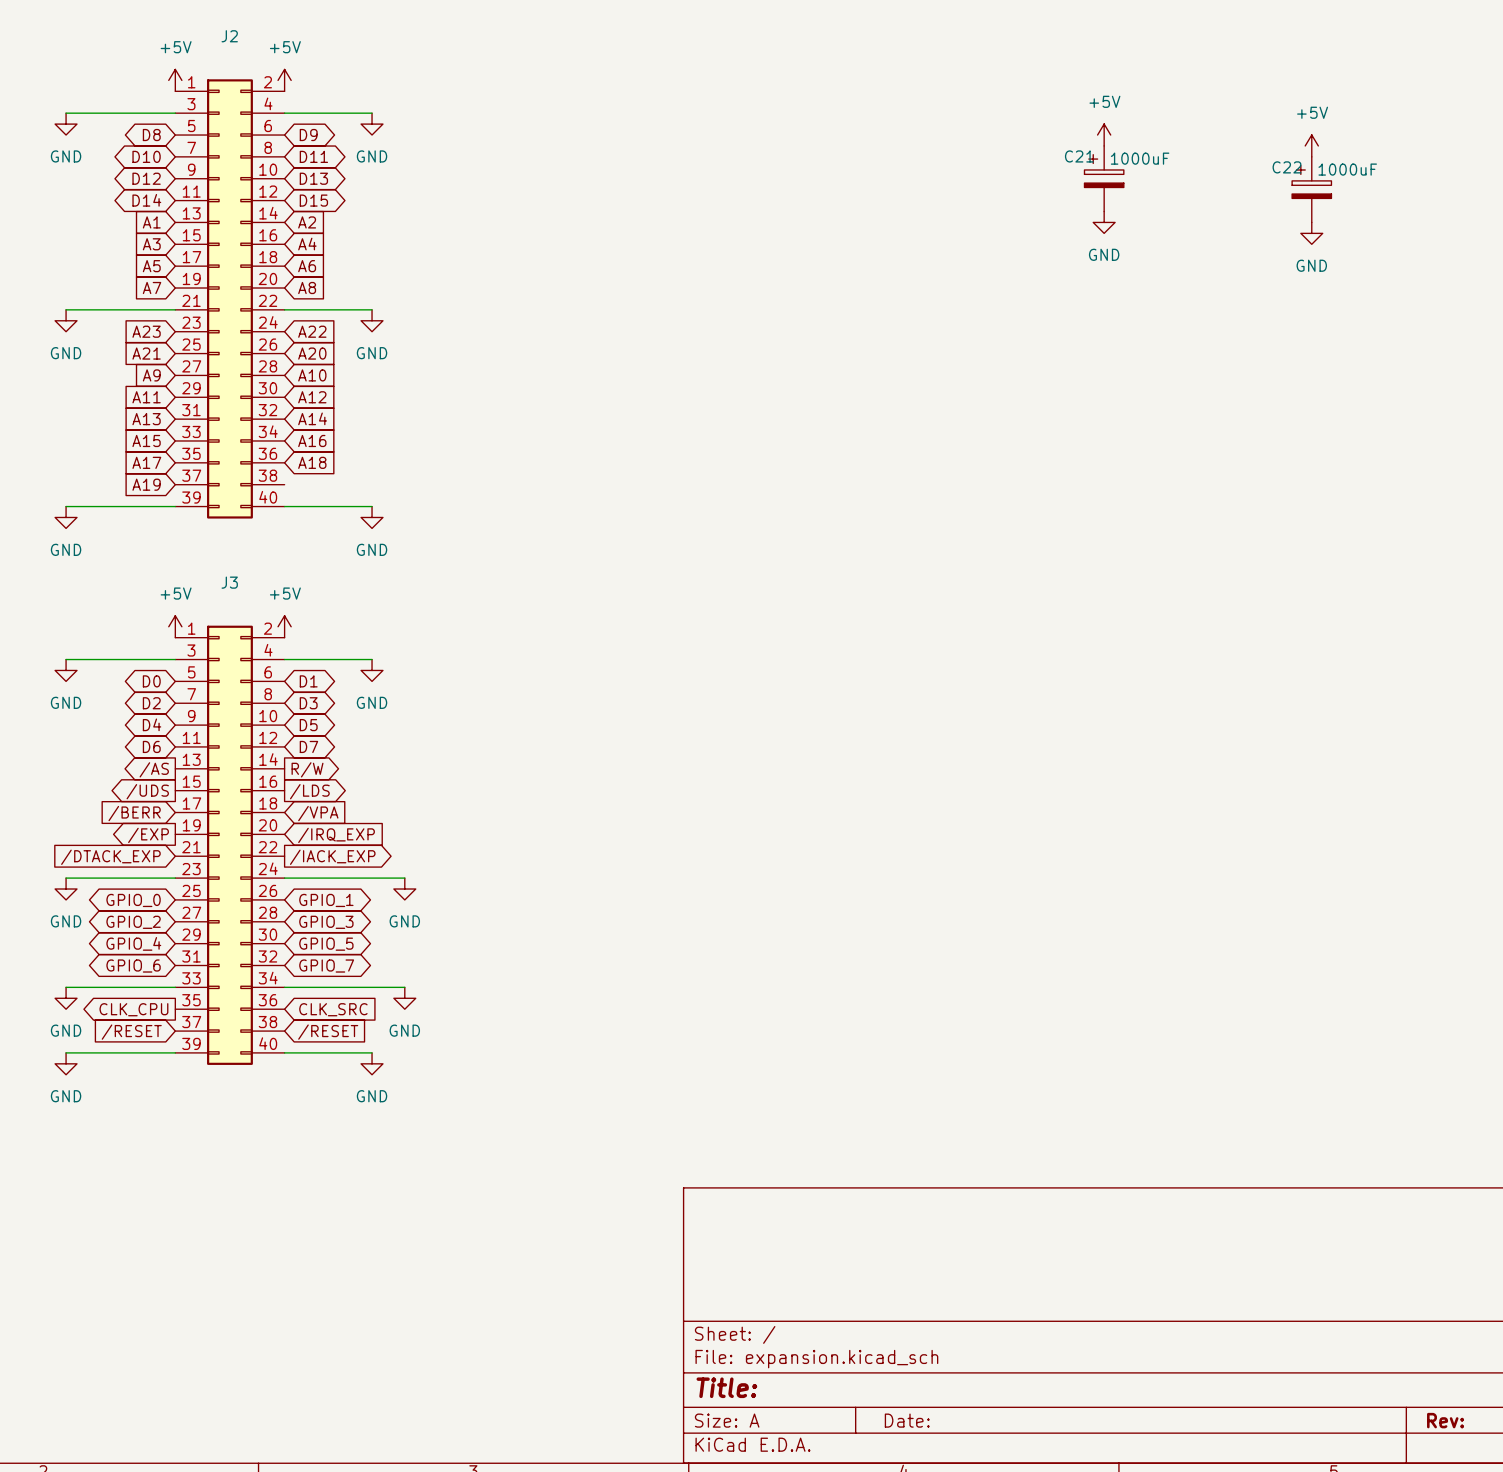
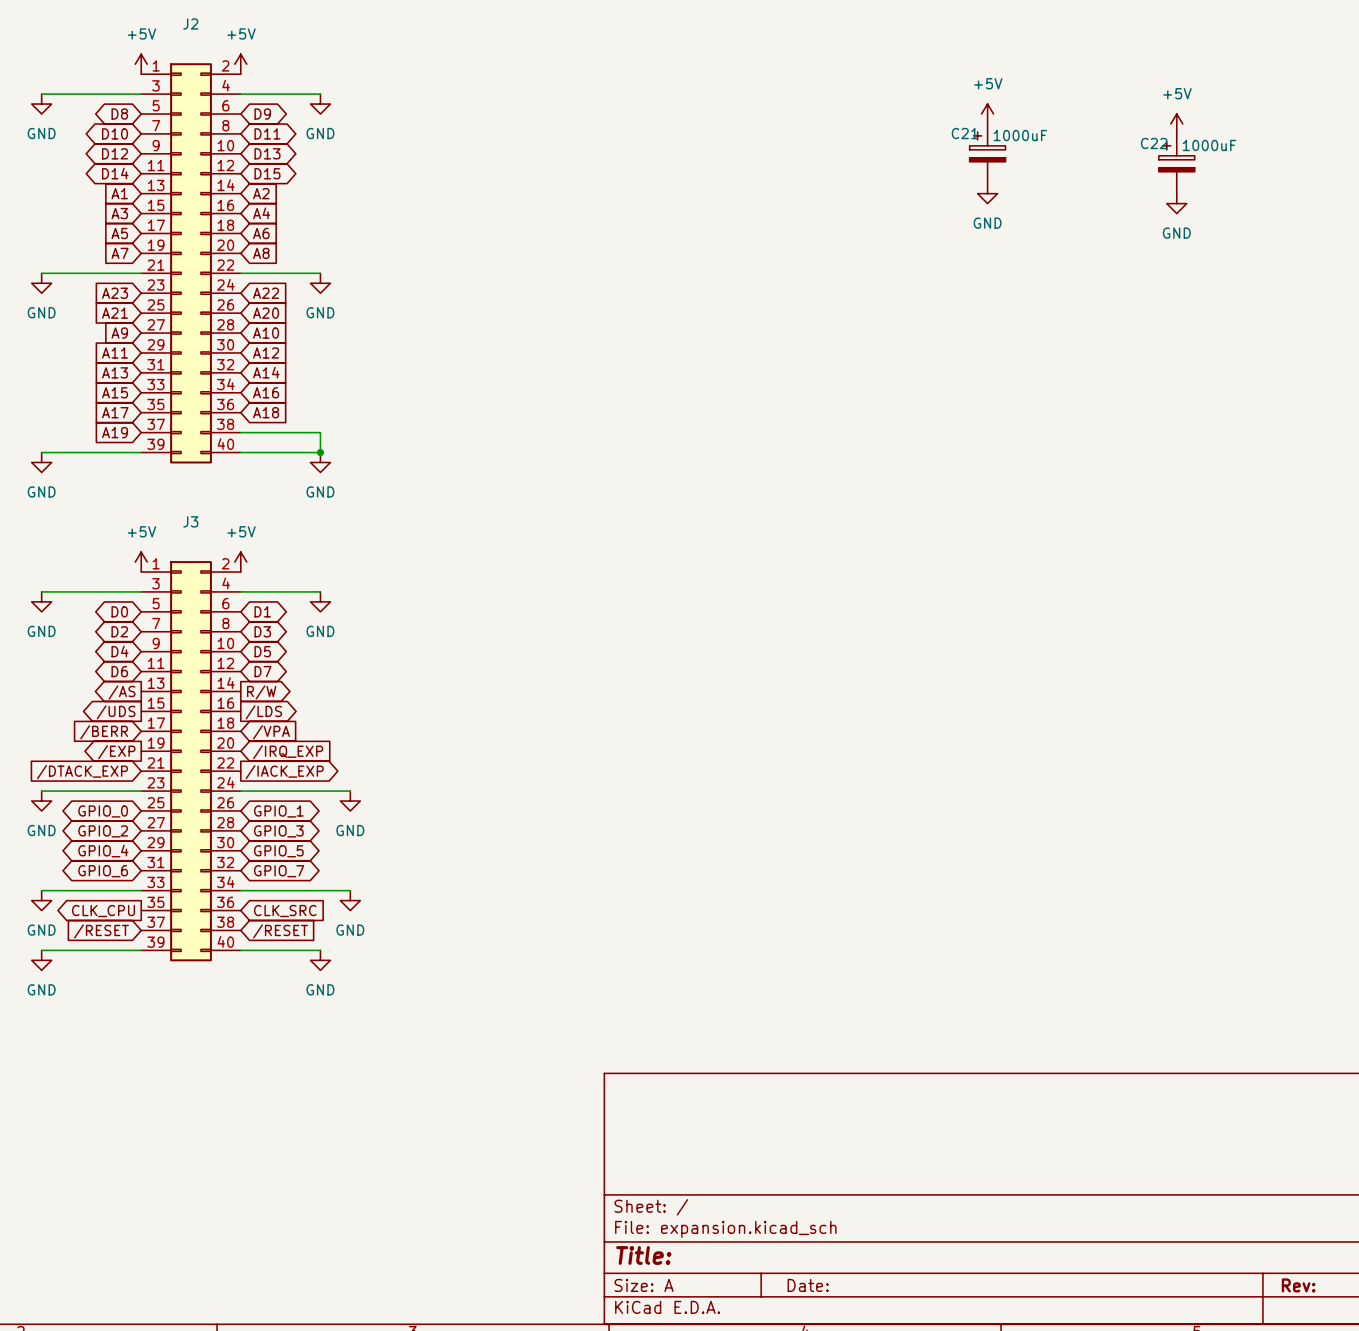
wire: none -> (240, 432) (320, 432) (320, 452)
junction: none -> (320, 452)

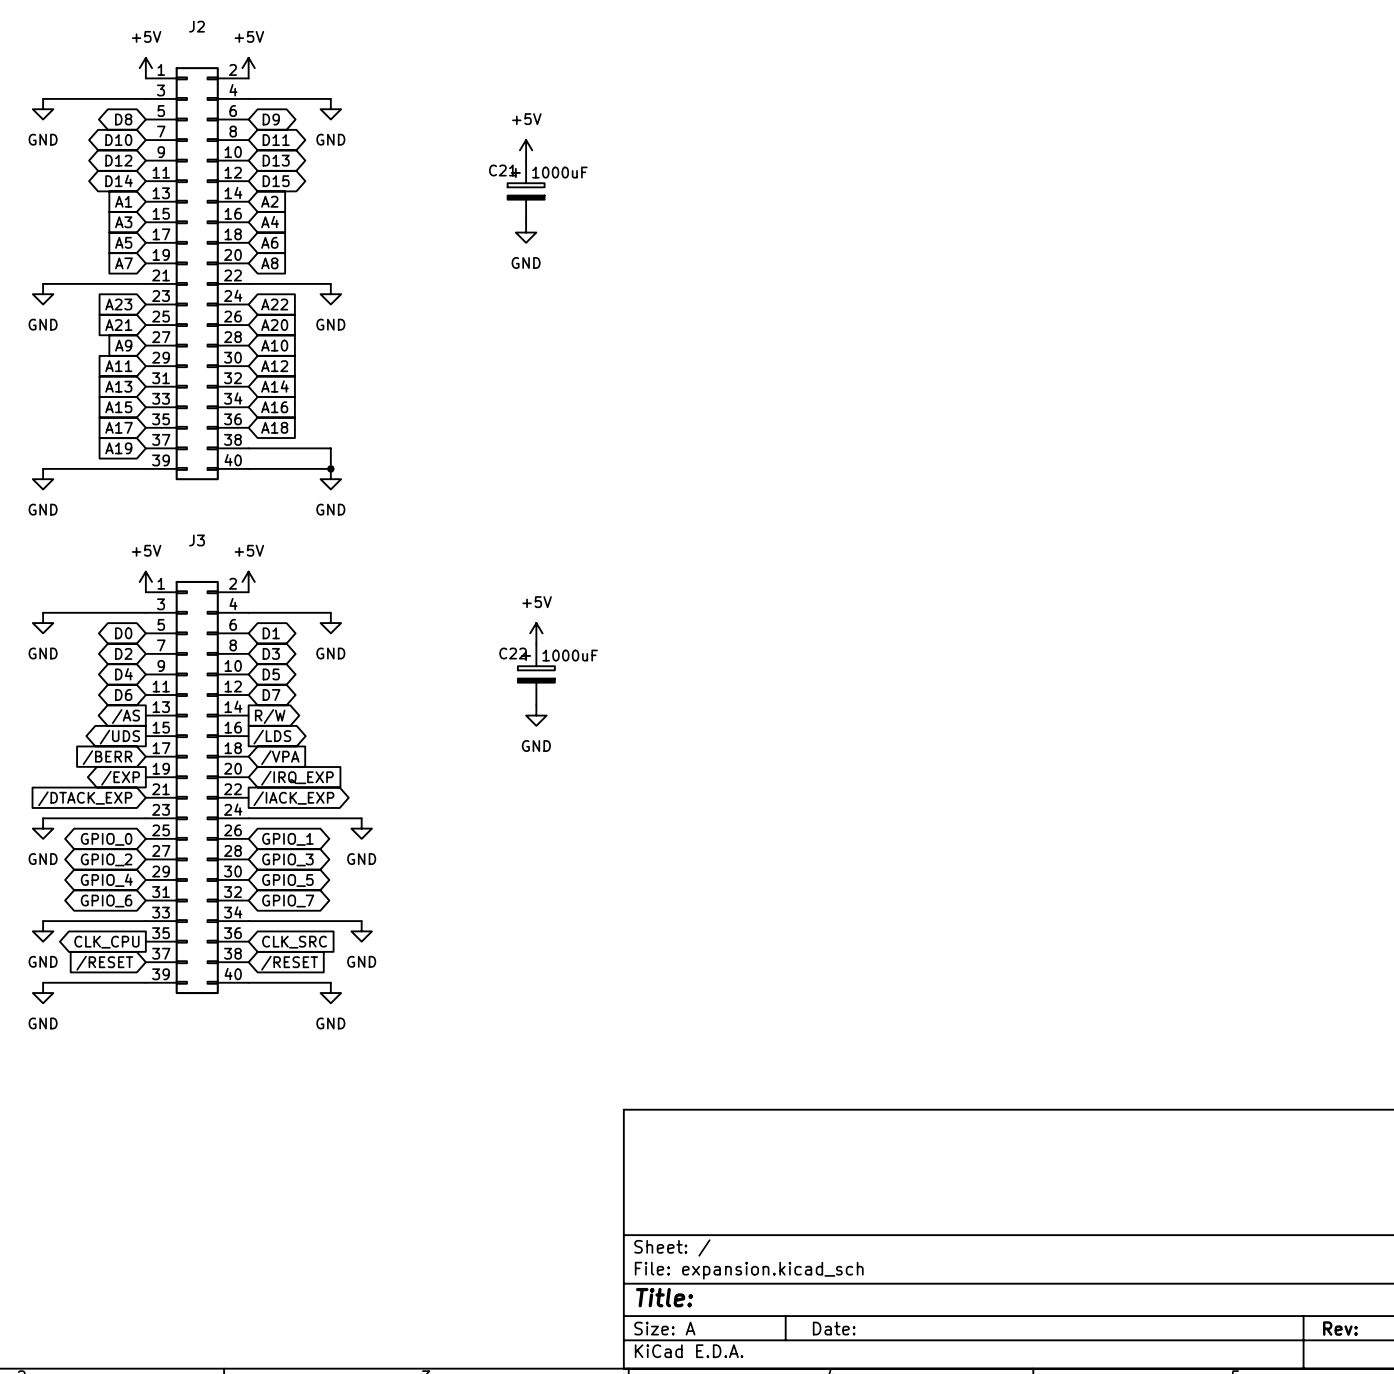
power symbol: +5V (987, 113) -> none
power symbol: +5V (1176, 123) -> none
power symbol: none -> +5V (526, 150)
C21 position: (987, 153) -> (526, 191)
C22 position: (1176, 163) -> (536, 674)
power symbol: GND (987, 193) -> none
power symbol: GND (1176, 203) -> none
power symbol: none -> GND (526, 232)
power symbol: none -> +5V (536, 633)
power symbol: none -> GND (536, 715)

